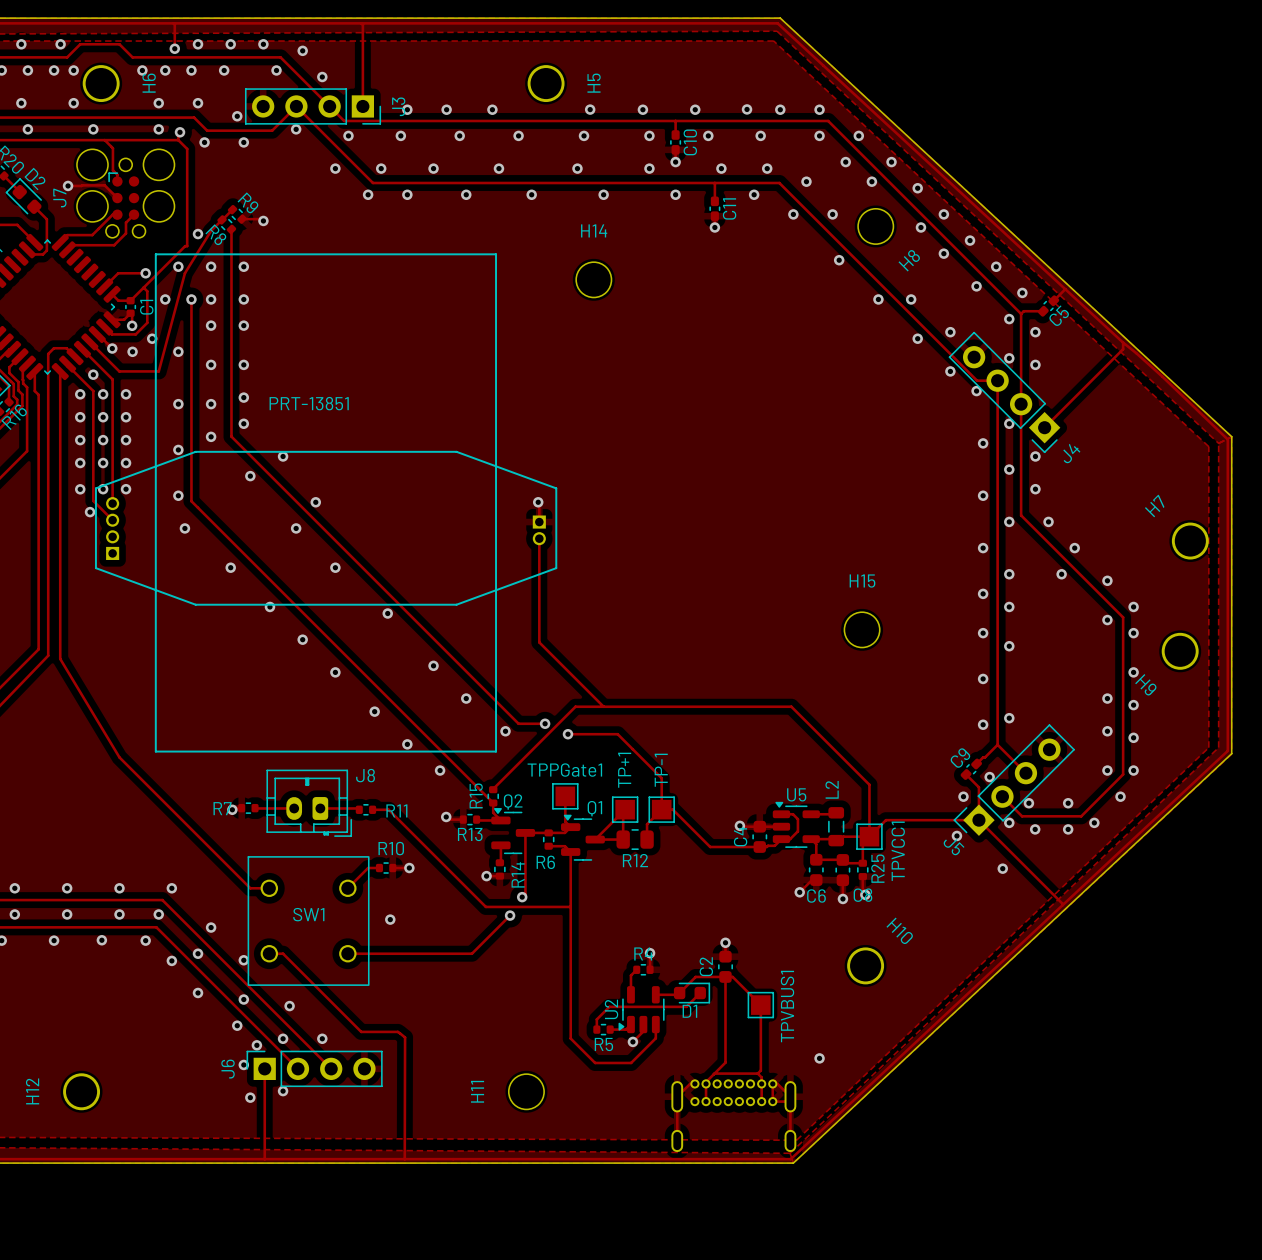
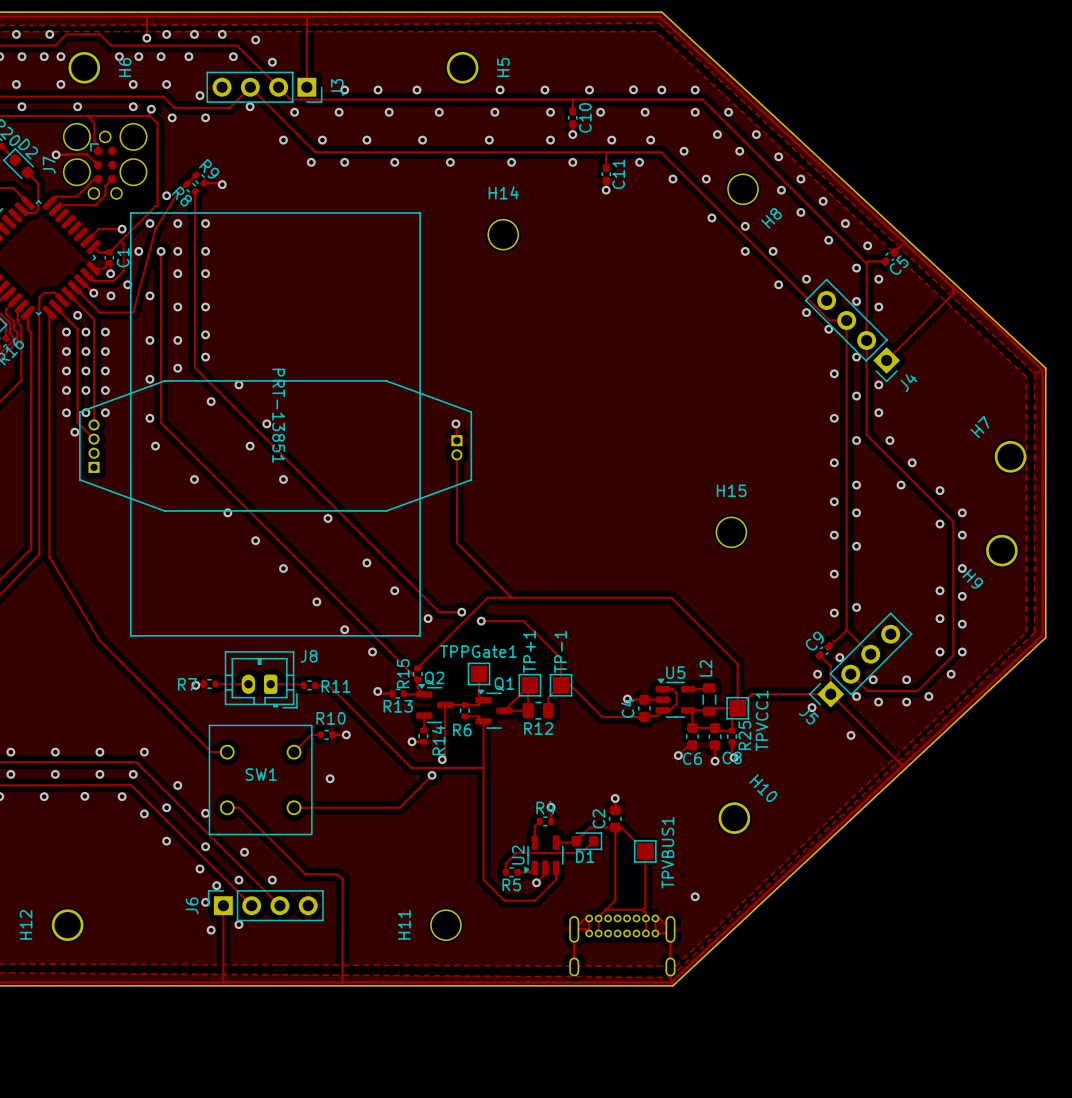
via: none -> (745, 226)
text rotation: 0° (309, 403) -> 90° clockwise (278, 415)
track: none -> (589, 918) (589, 933) (585, 929) (574, 929)

